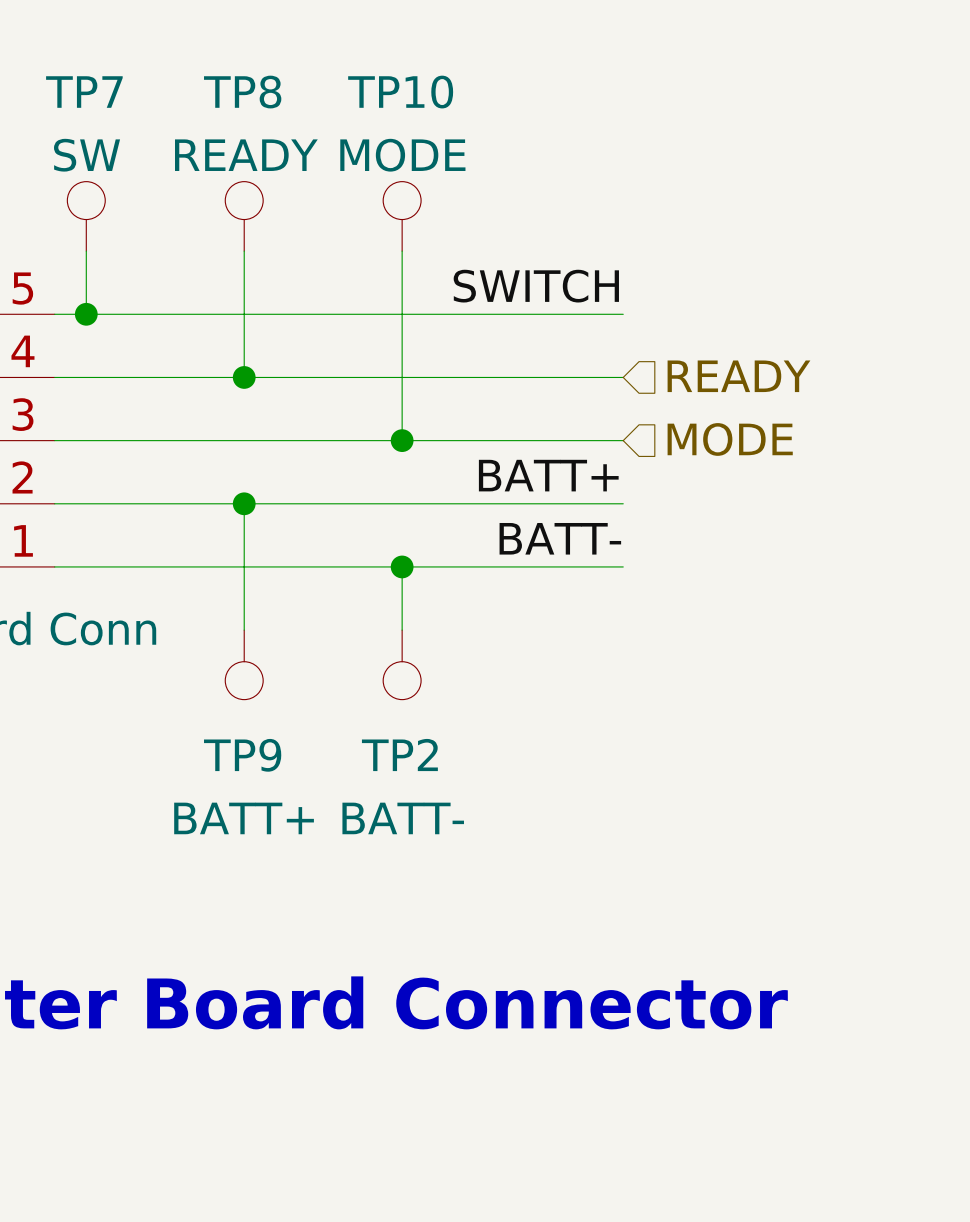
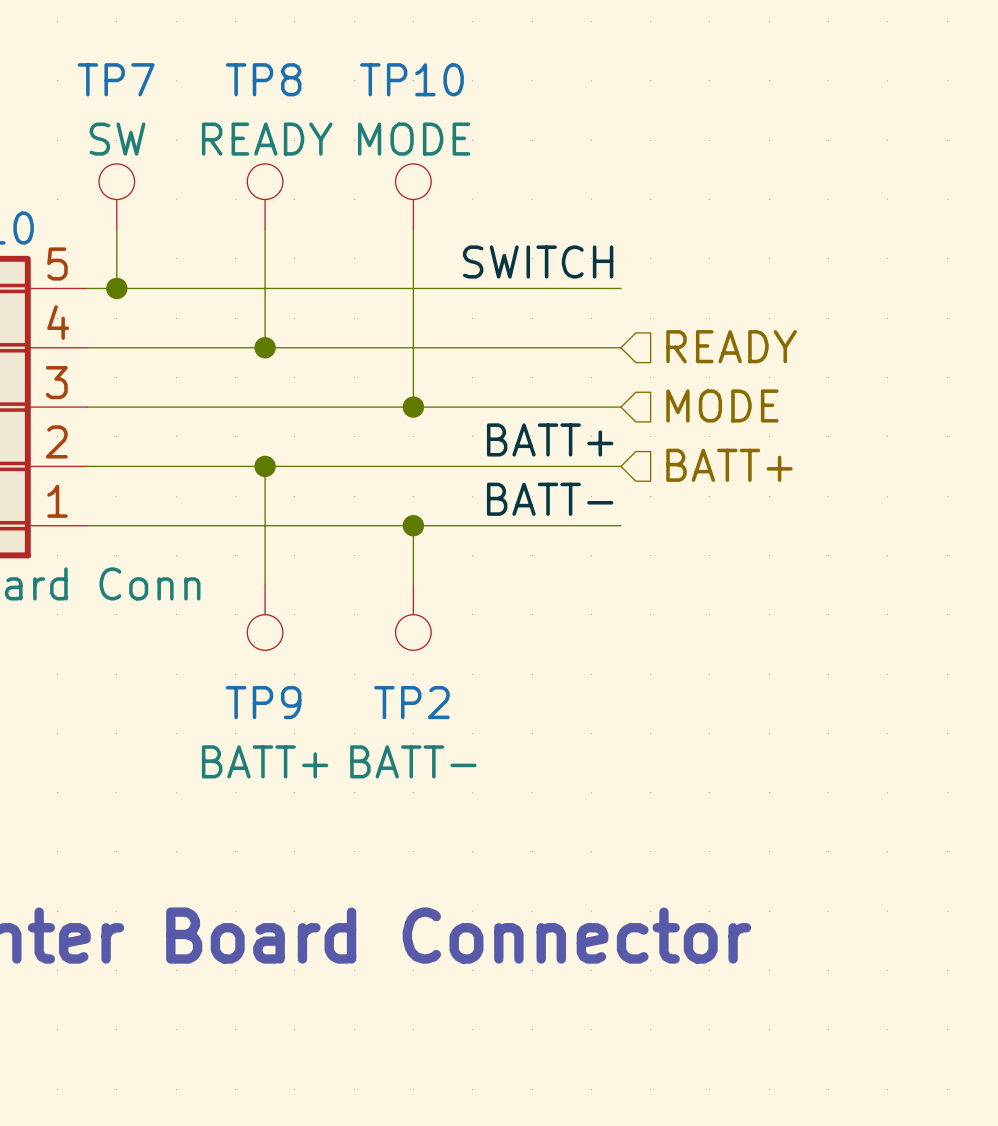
hierarchical label: none -> BATT+ (729, 465)

